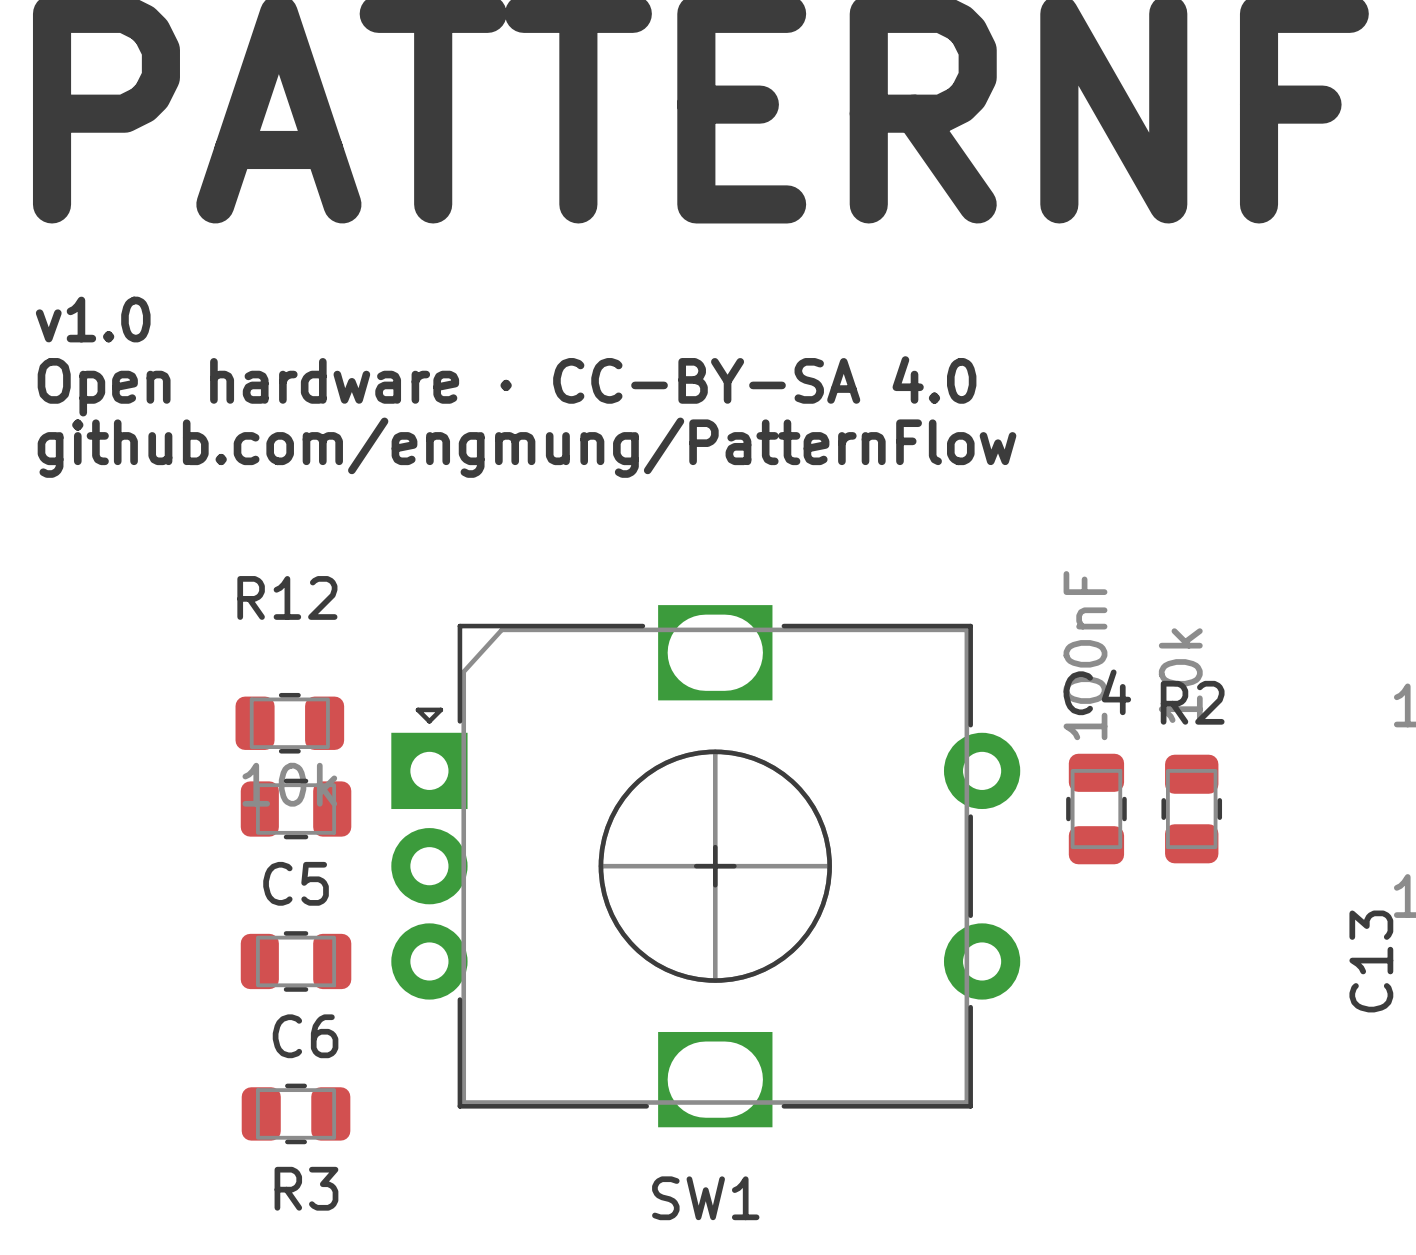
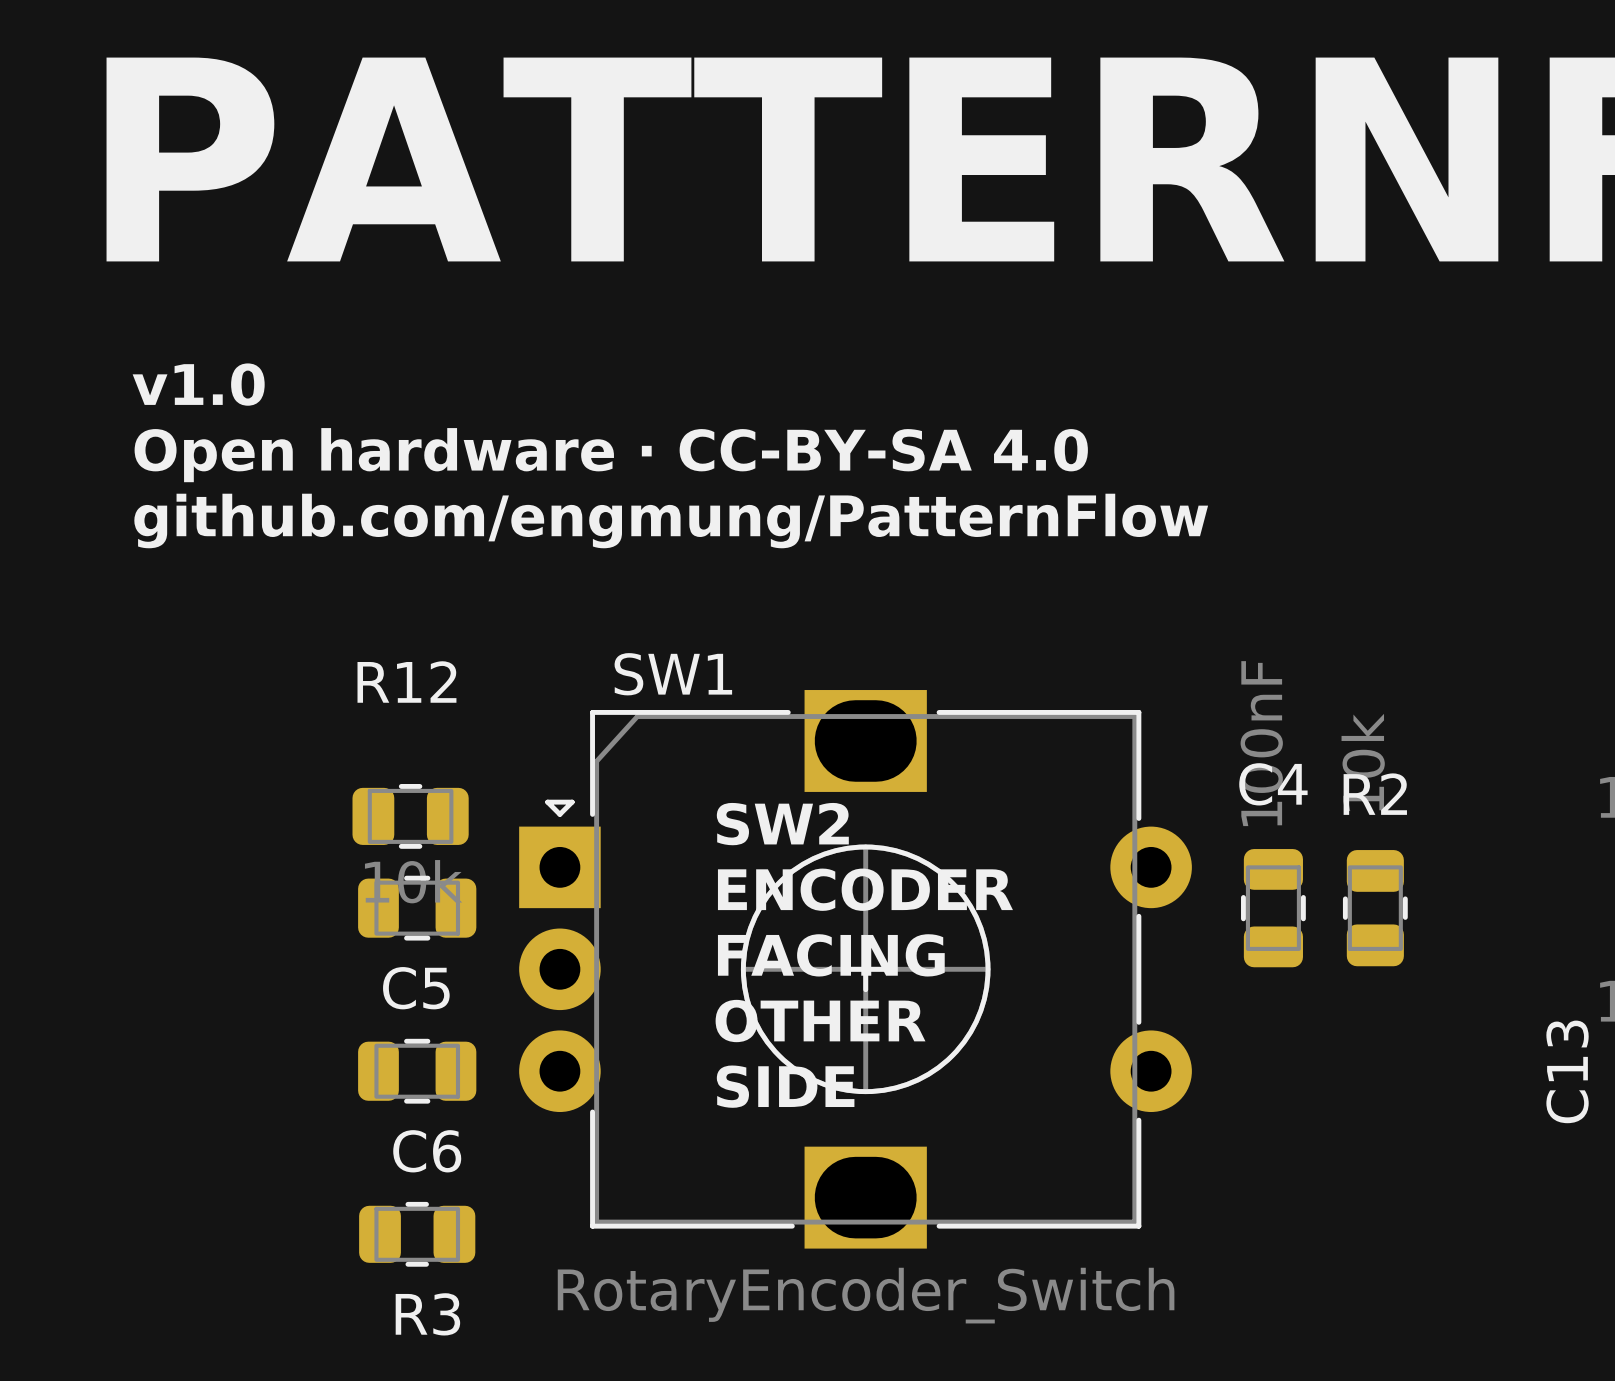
text: none -> SW2 (782, 824)
text: none -> ENCODER (865, 889)
text: none -> FACING (831, 955)
text: none -> OTHER (820, 1021)
text: none -> SIDE (785, 1086)
SW1 value: none -> RotaryEncoder_Switch (866, 1295)
SW1 name position: SW1 (705, 1198) -> SW1 (673, 674)

